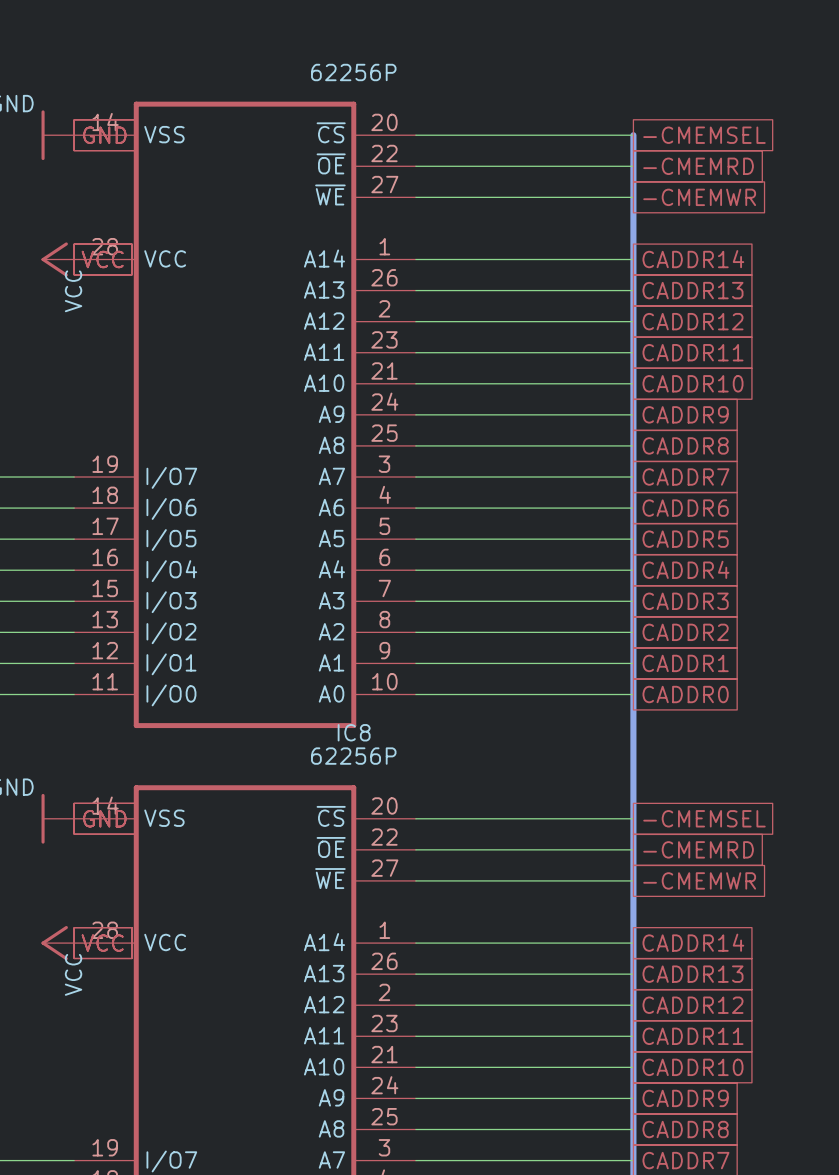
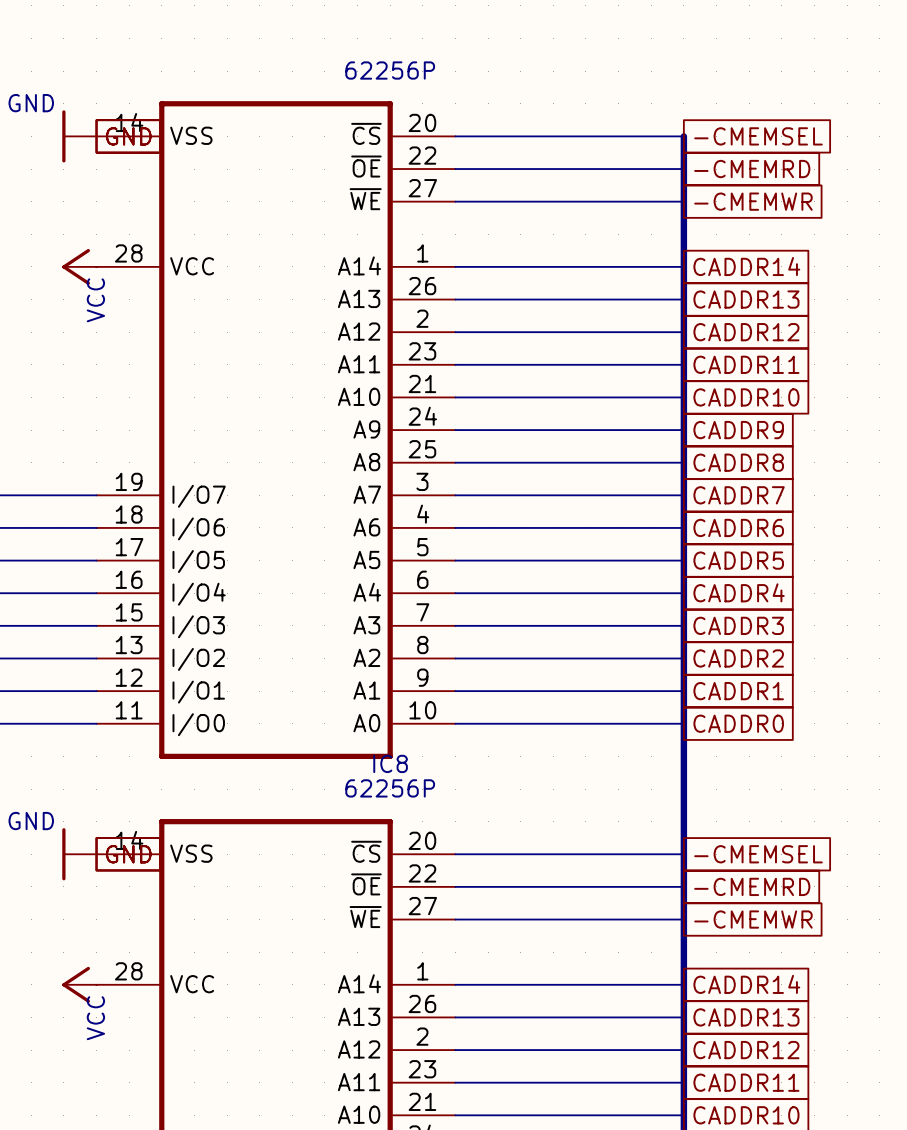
global label: VCC (102, 259) -> none
global label: VCC (102, 943) -> none

